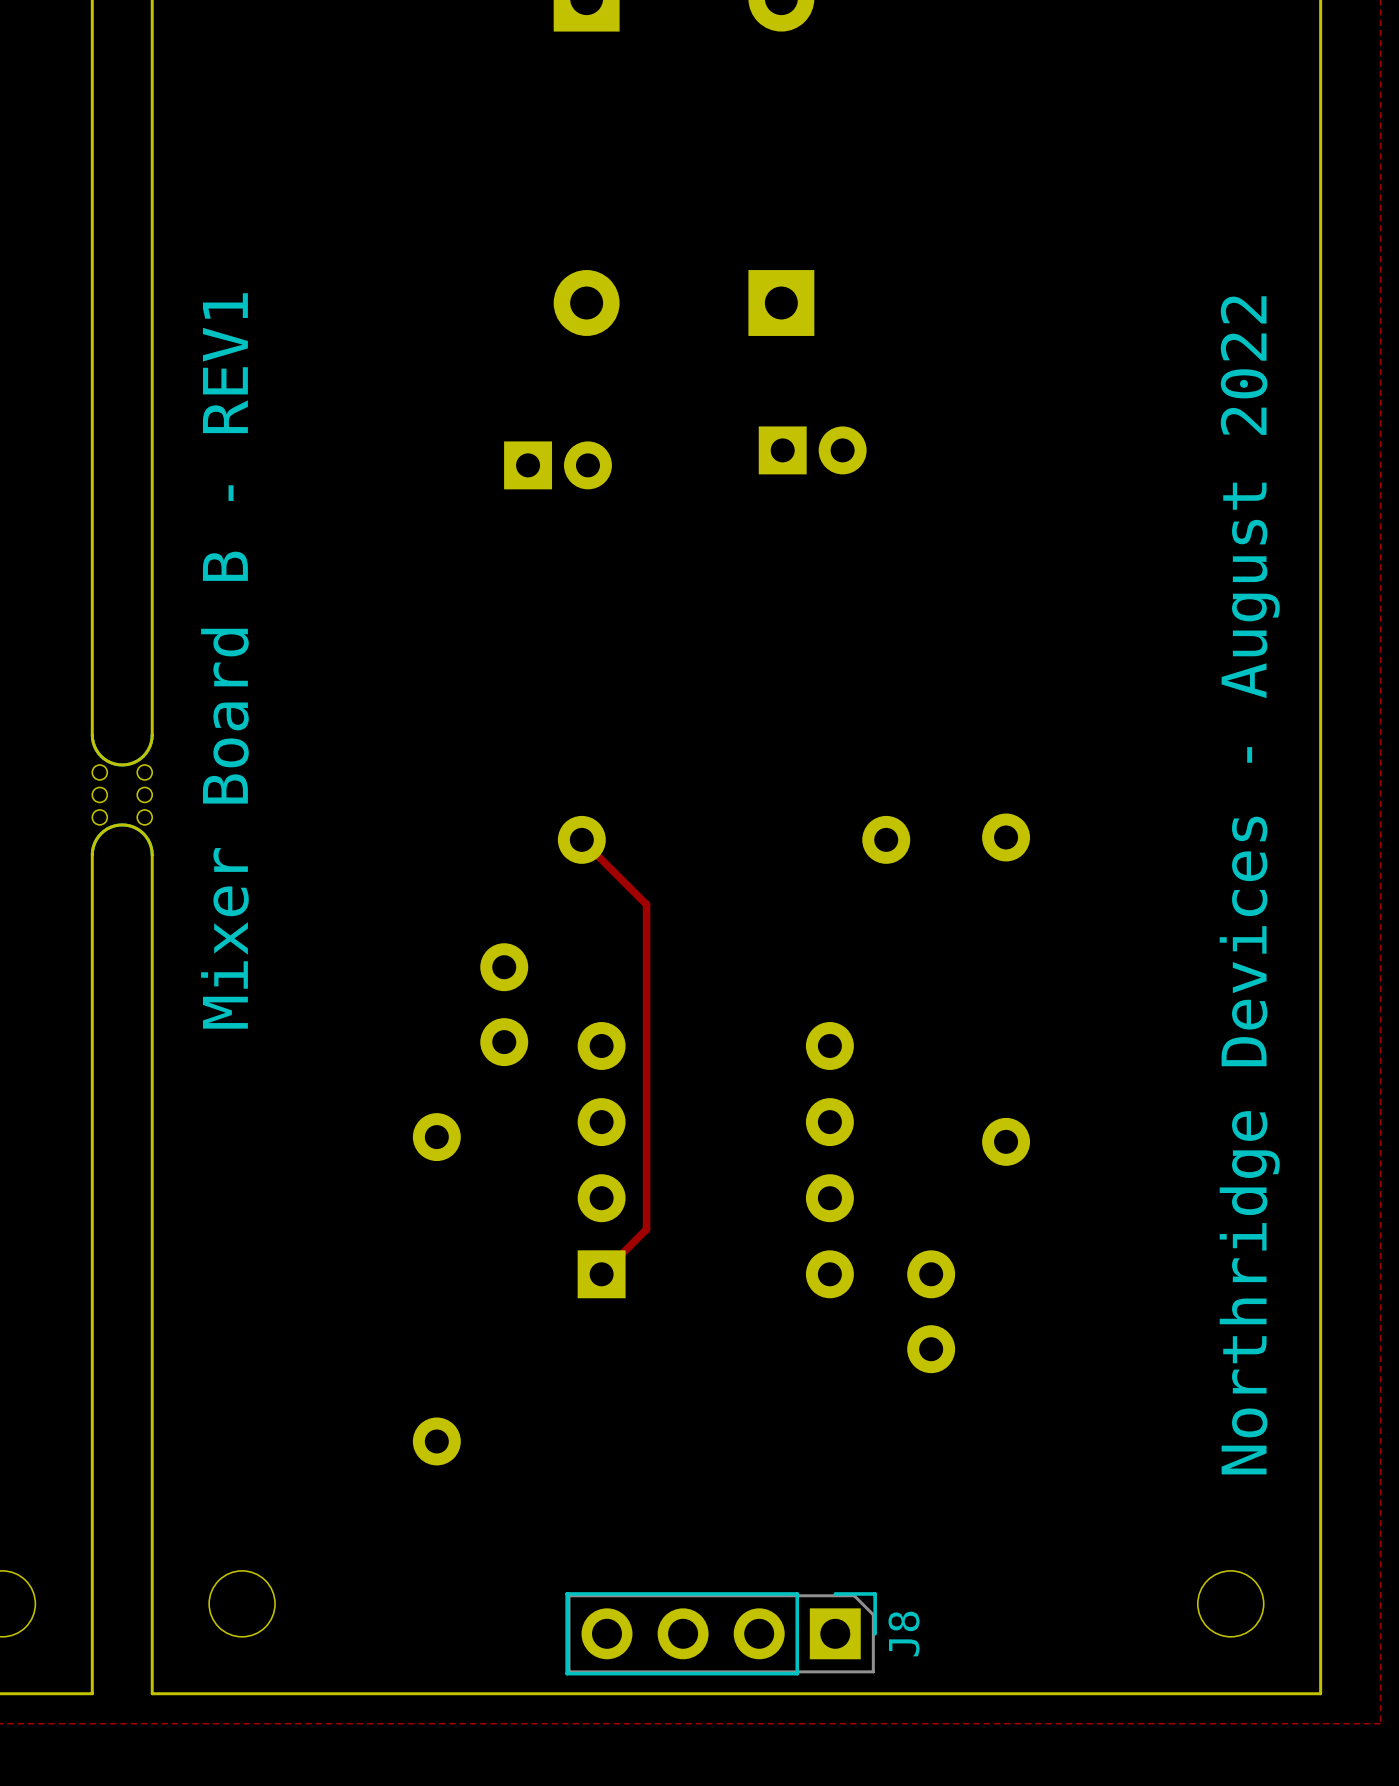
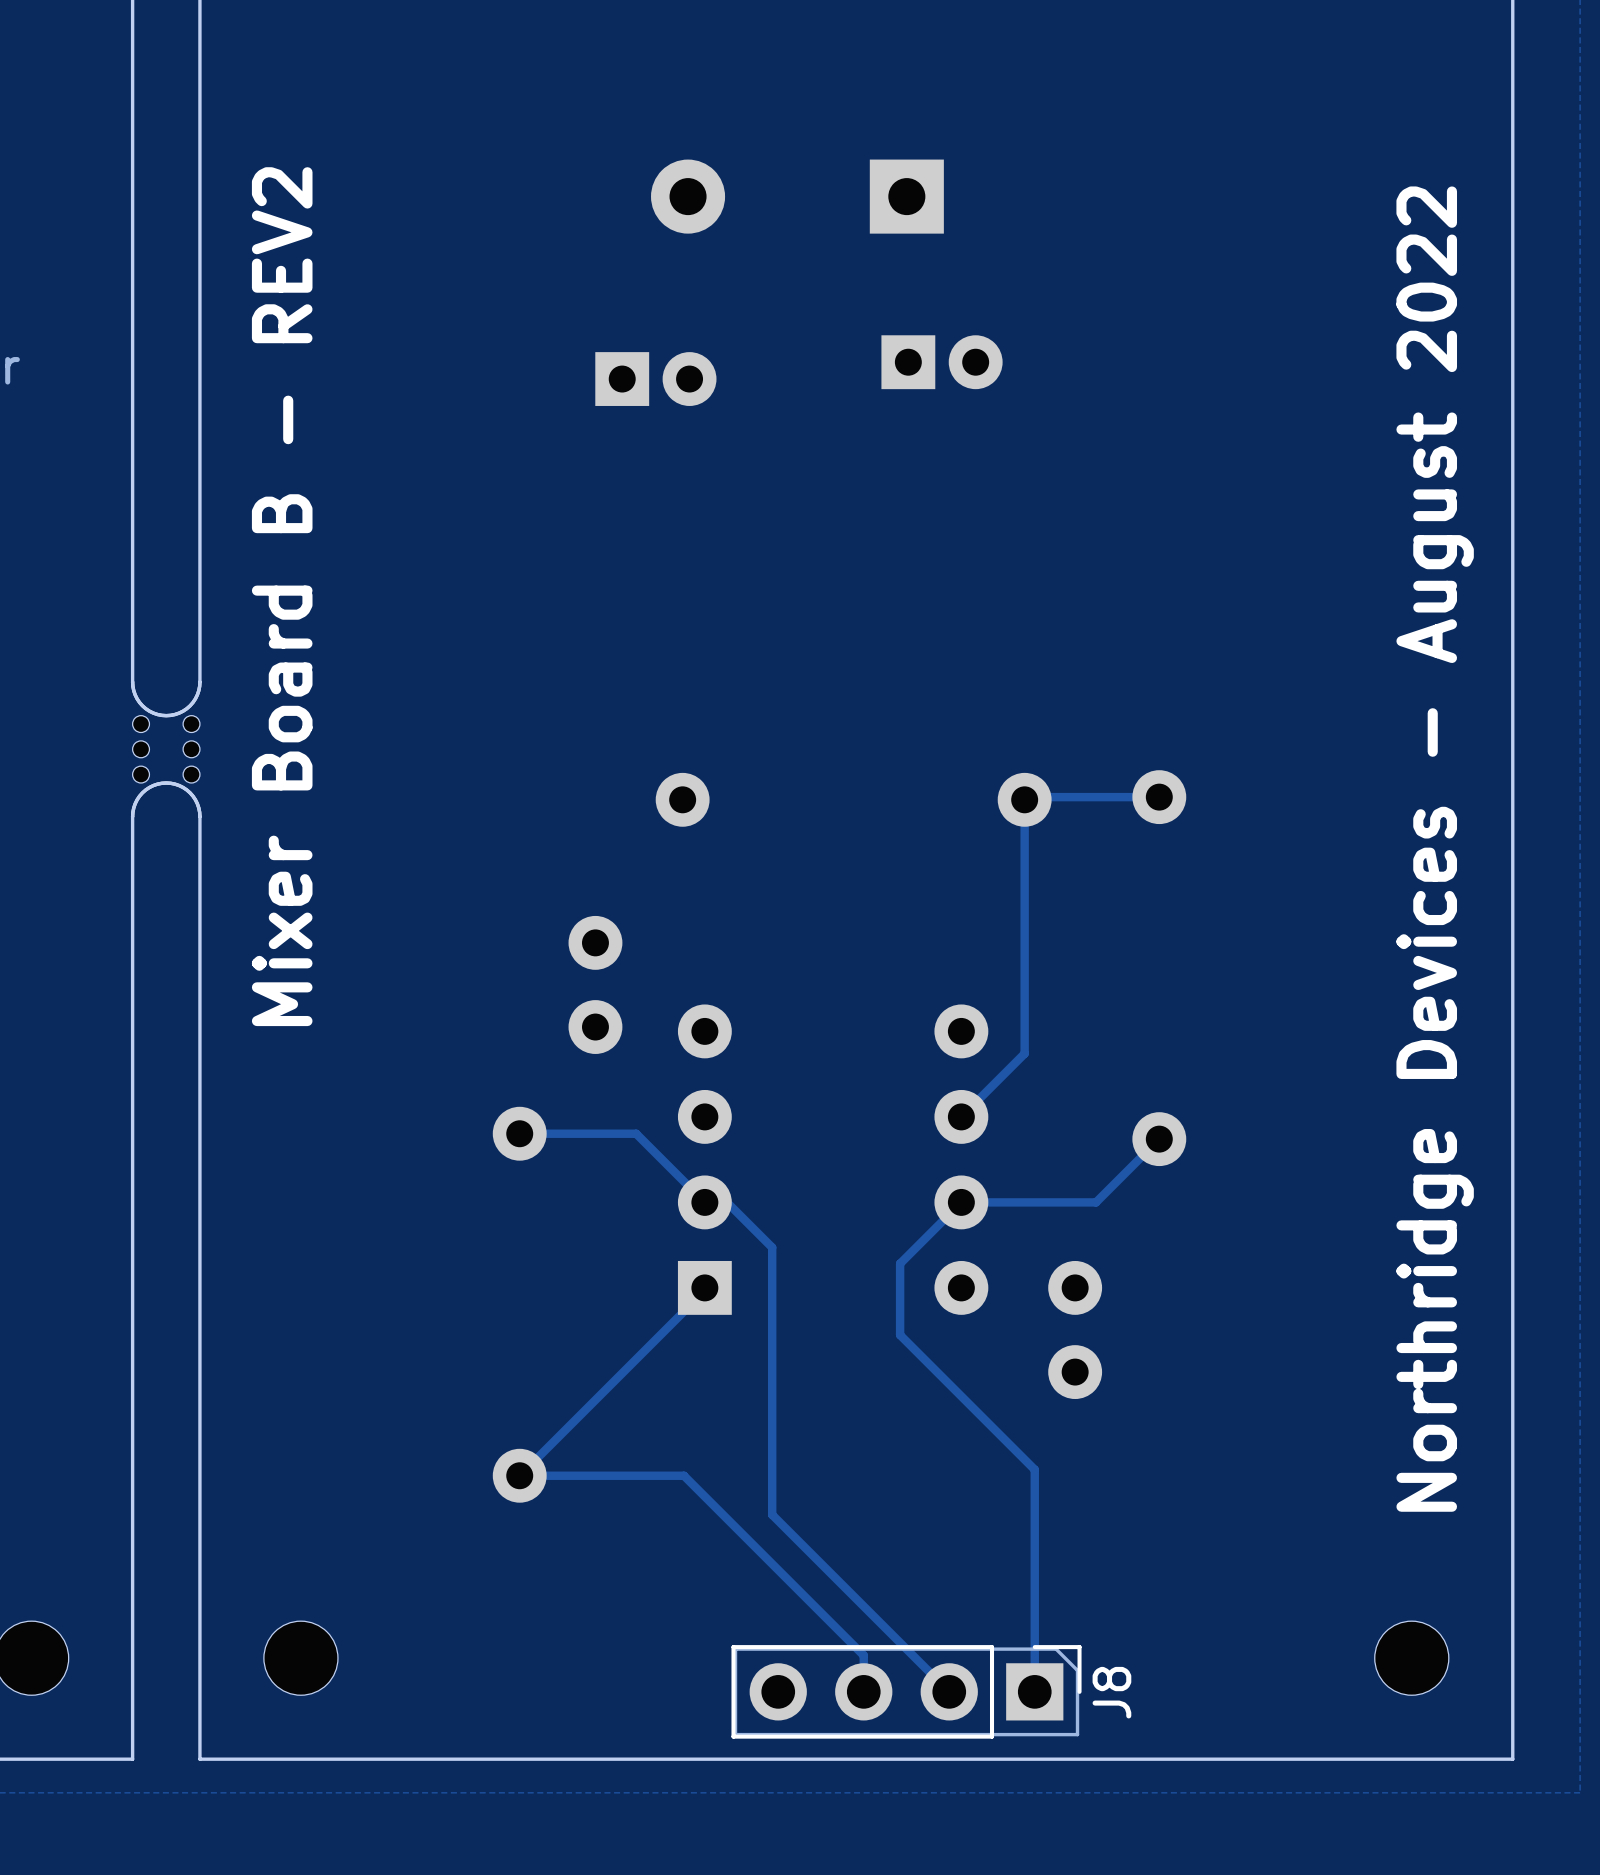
text: Mixer Board B - REV1 (224, 660) -> Mixer Board B - REV2 (282, 596)
track: none -> (1027, 797) (1159, 797)
track: (581, 839) (646, 904) (646, 1229) (601, 1274) -> none
track: none -> (1024, 799) (1024, 1053) (961, 1116)
track: none -> (519, 1133) (636, 1133) (704, 1202)
track: none -> (1159, 1139) (1096, 1202) (961, 1202) (900, 1263) (900, 1335) (1034, 1469) (1034, 1691)
track: none -> (727, 1202) (772, 1247) (772, 1514) (949, 1691)
track: none -> (704, 1290) (519, 1475) (684, 1475) (863, 1655) (863, 1691)
J8 position: (721, 1633) -> (906, 1691)

